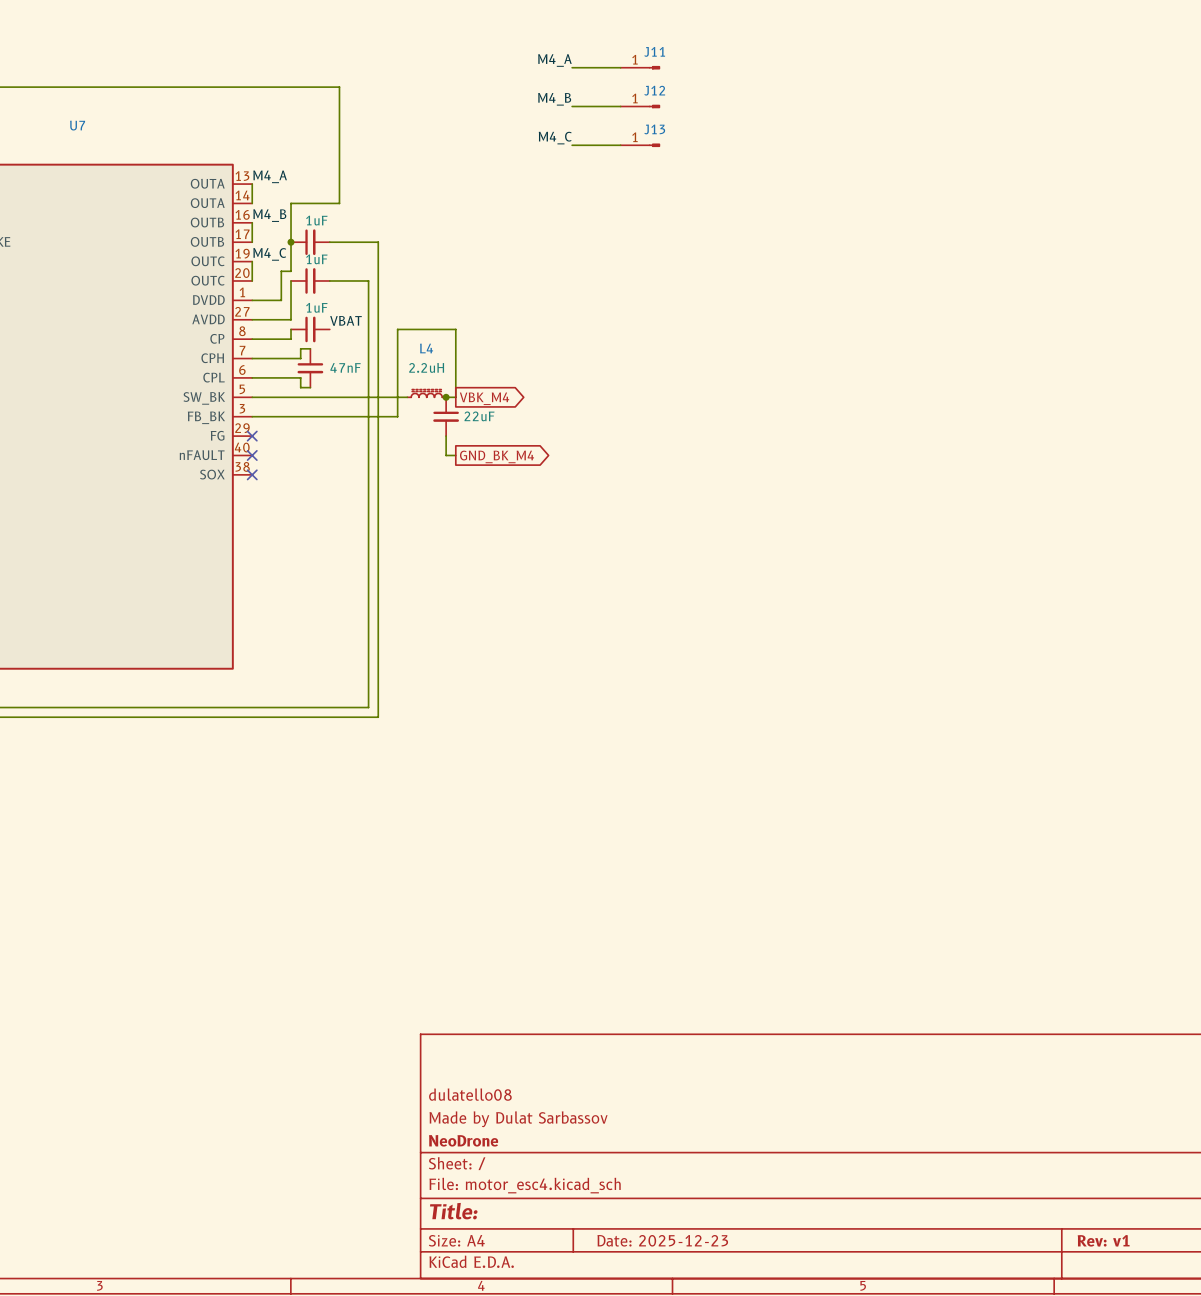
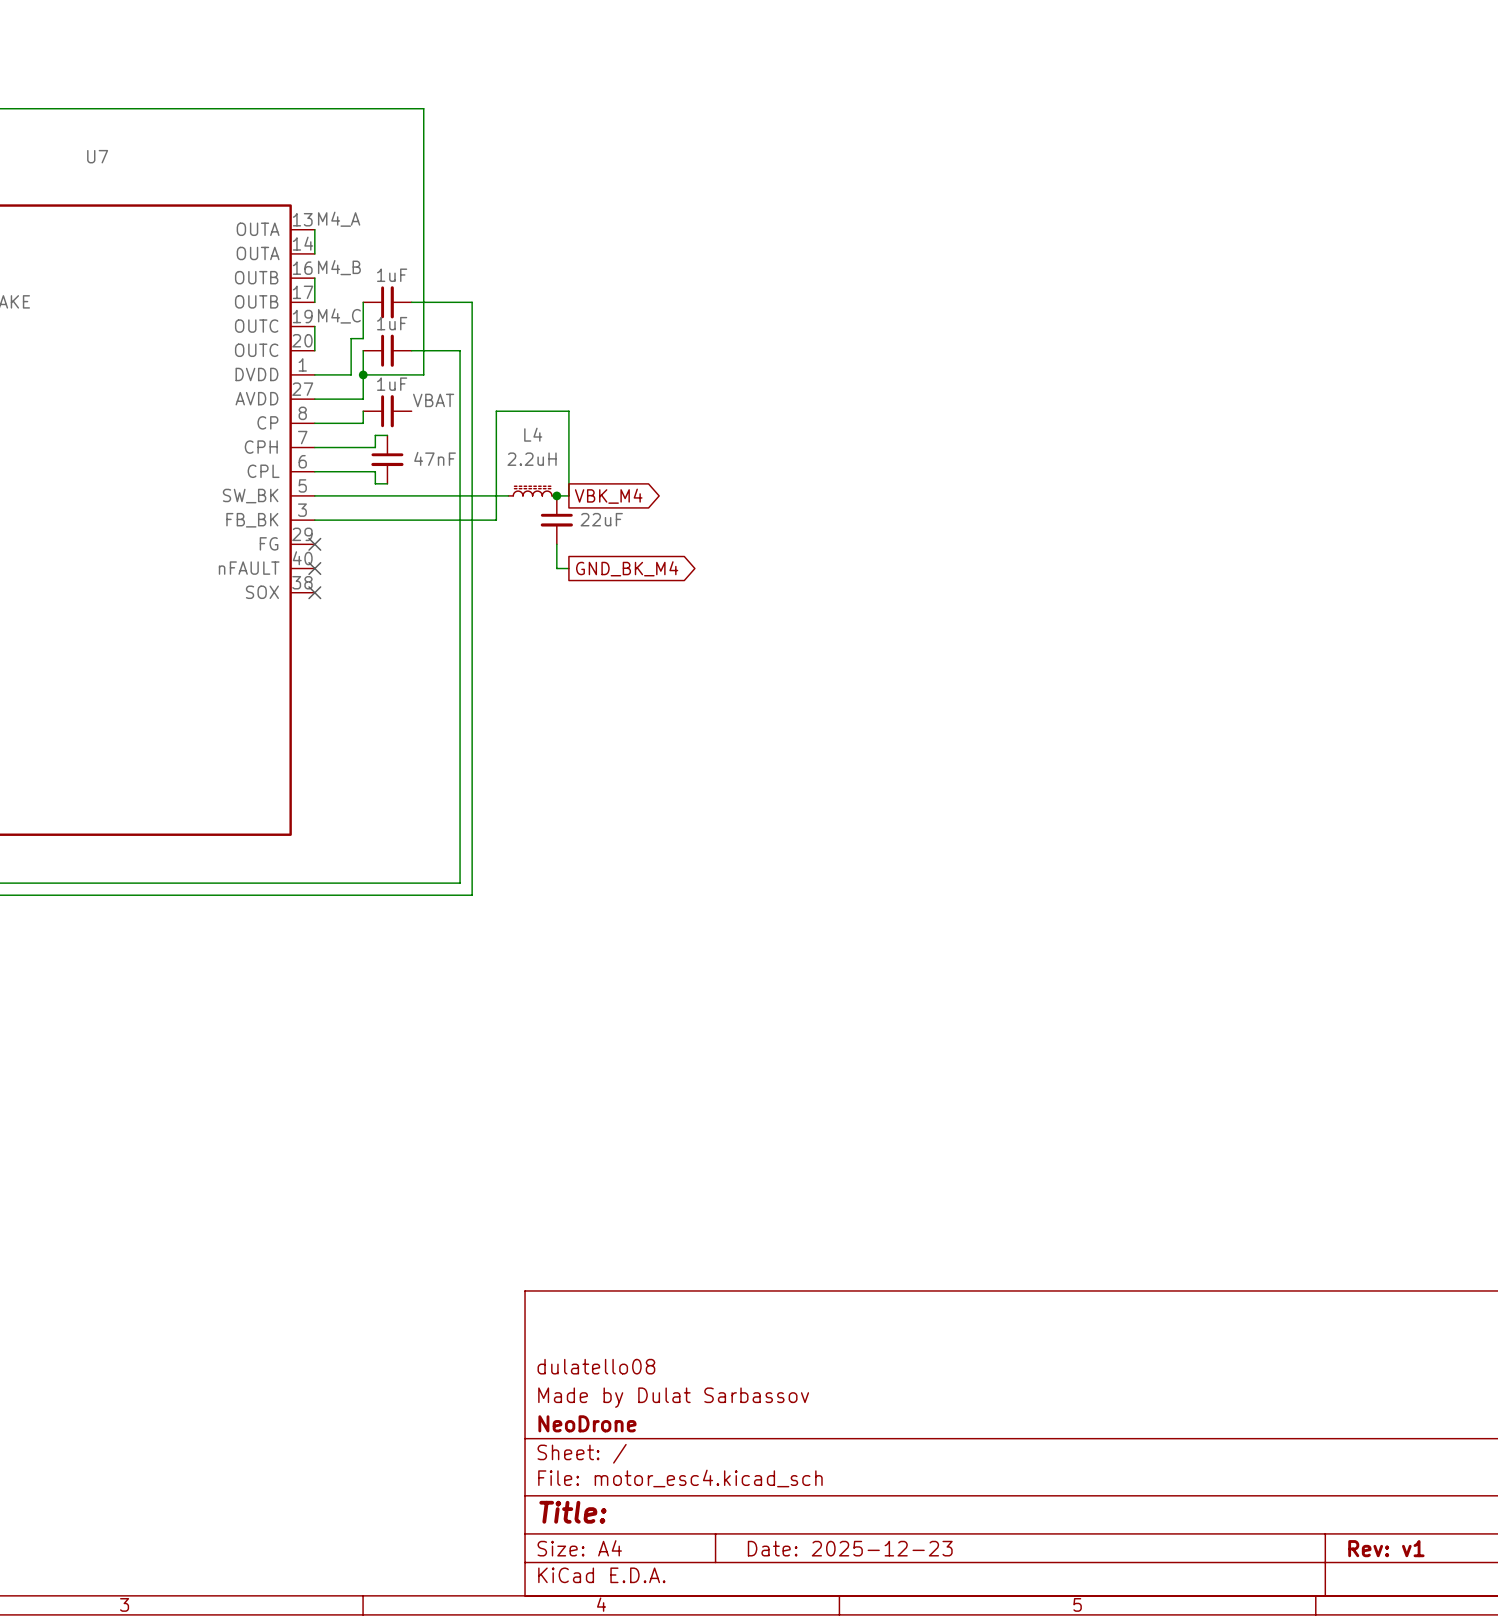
label: M4_A (554, 60) -> none
wire: (572, 67) (620, 67) -> none
J11: (640, 67) -> none
label: M4_B (554, 99) -> none
wire: (572, 106) (620, 106) -> none
J12: (640, 106) -> none
label: M4_C (555, 138) -> none
wire: (572, 145) (620, 145) -> none
J13: (640, 145) -> none
wire: (339, 203) (291, 203) (291, 242) -> (423, 253) (423, 374) (363, 374)
junction: (291, 242) -> none
junction: none -> (363, 374)

